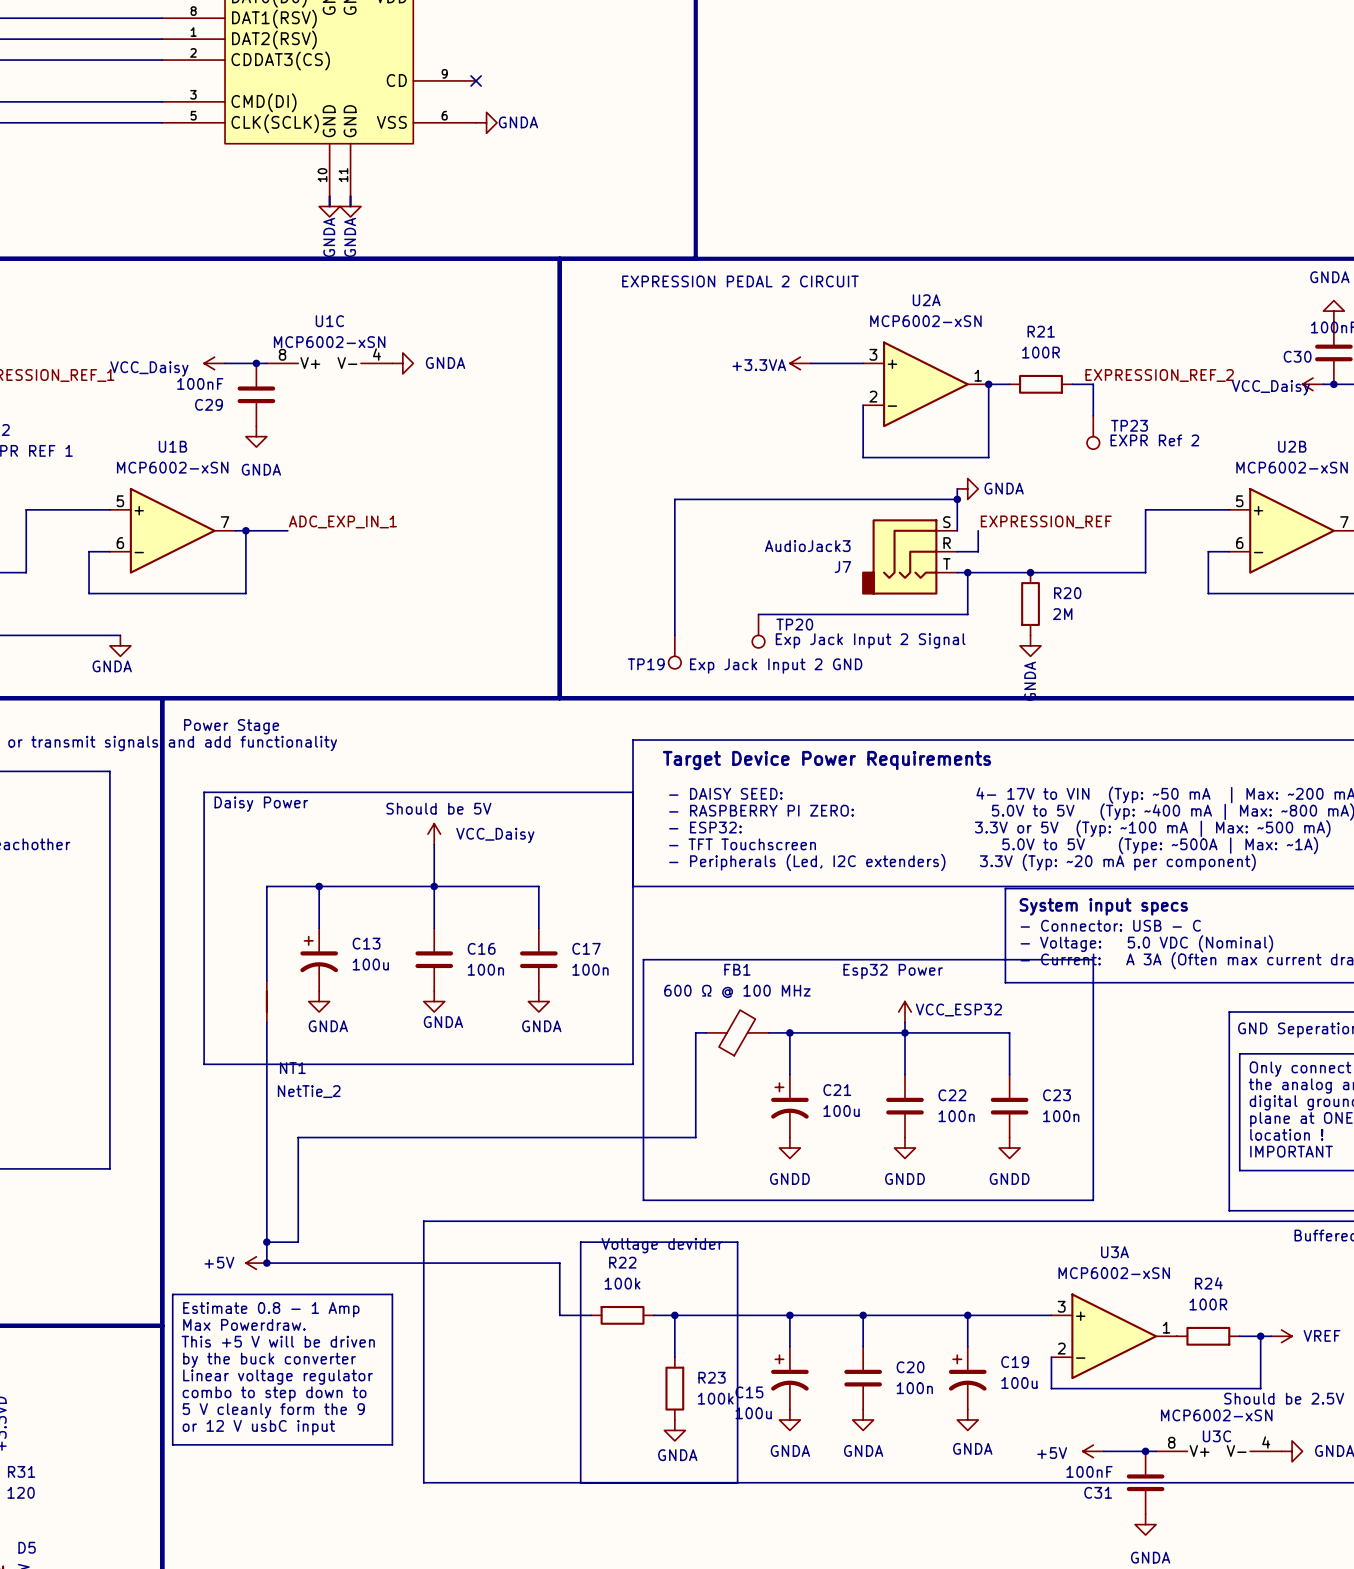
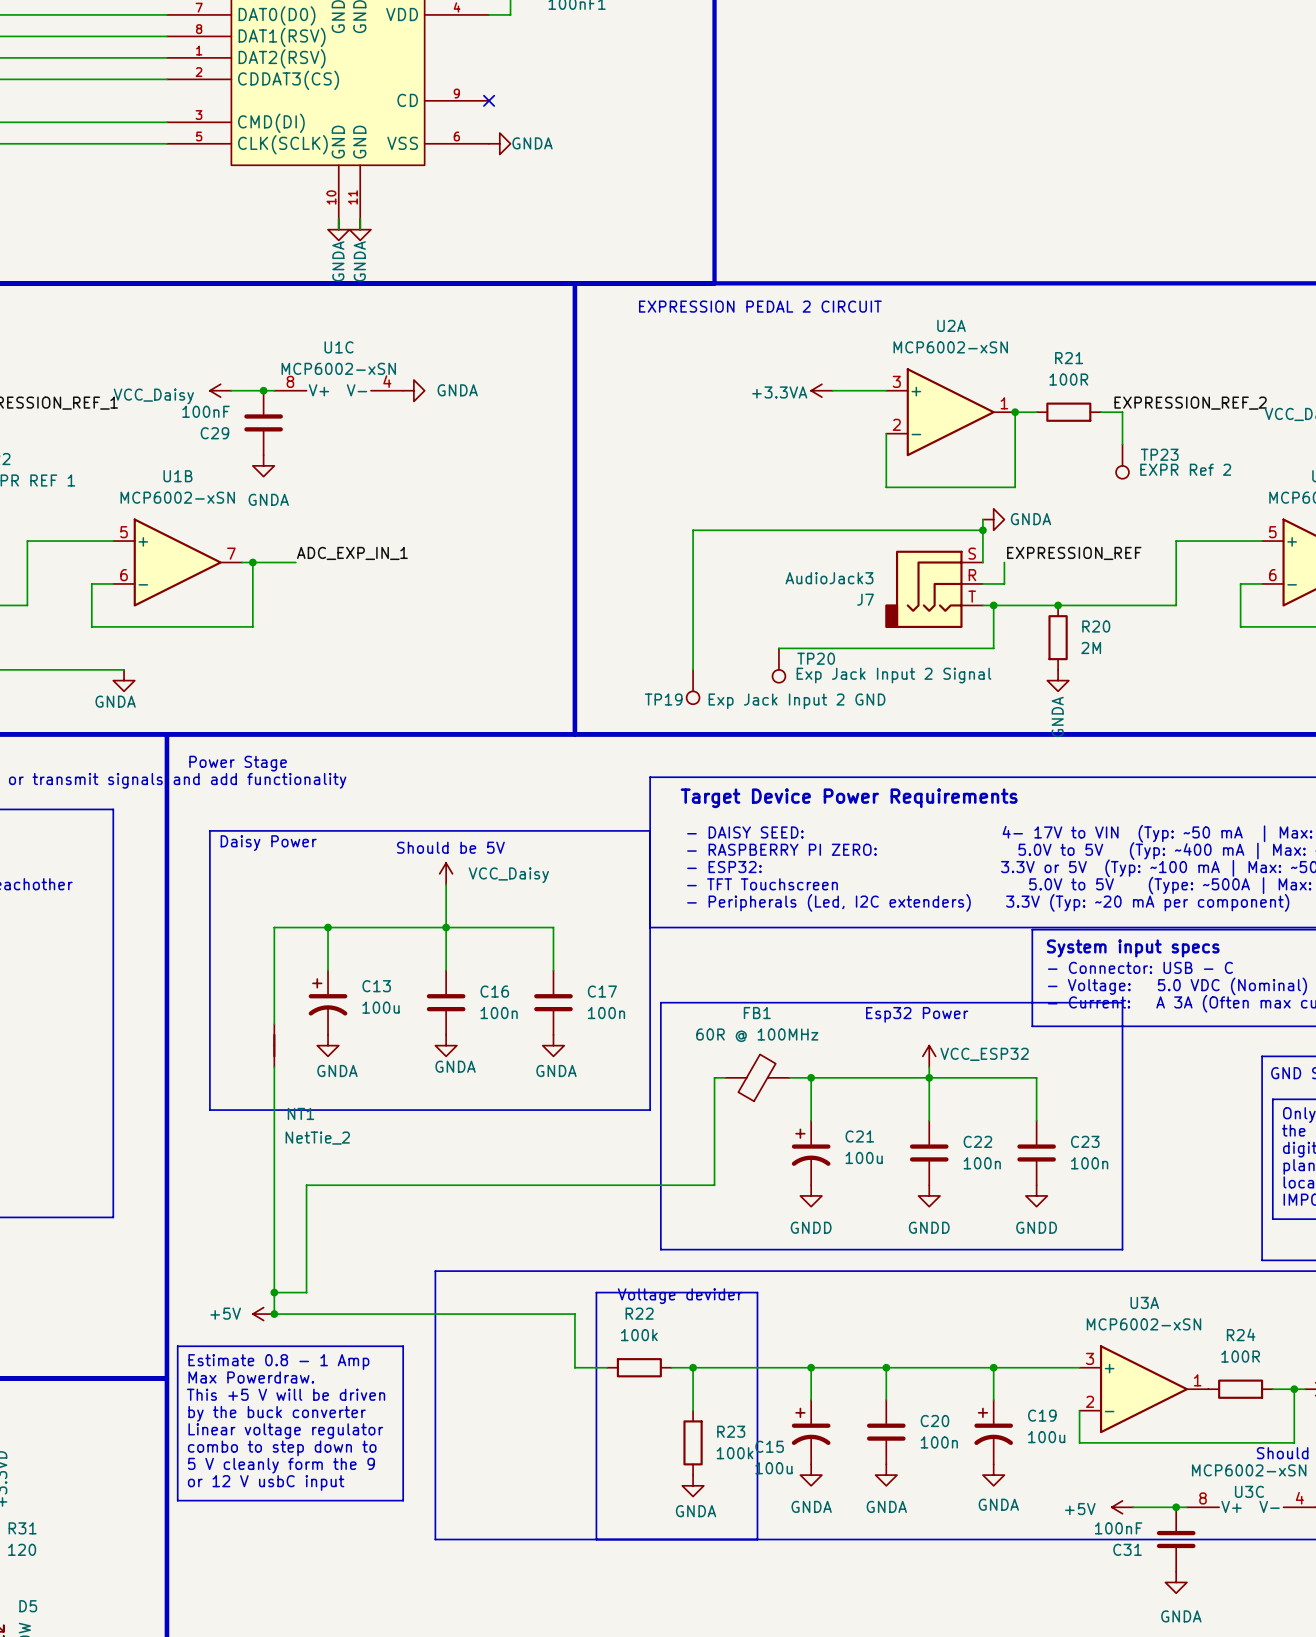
FB1 value: 600 Ω @ 100 MHz (737, 991) -> 60R @ 100MHz (757, 1035)

